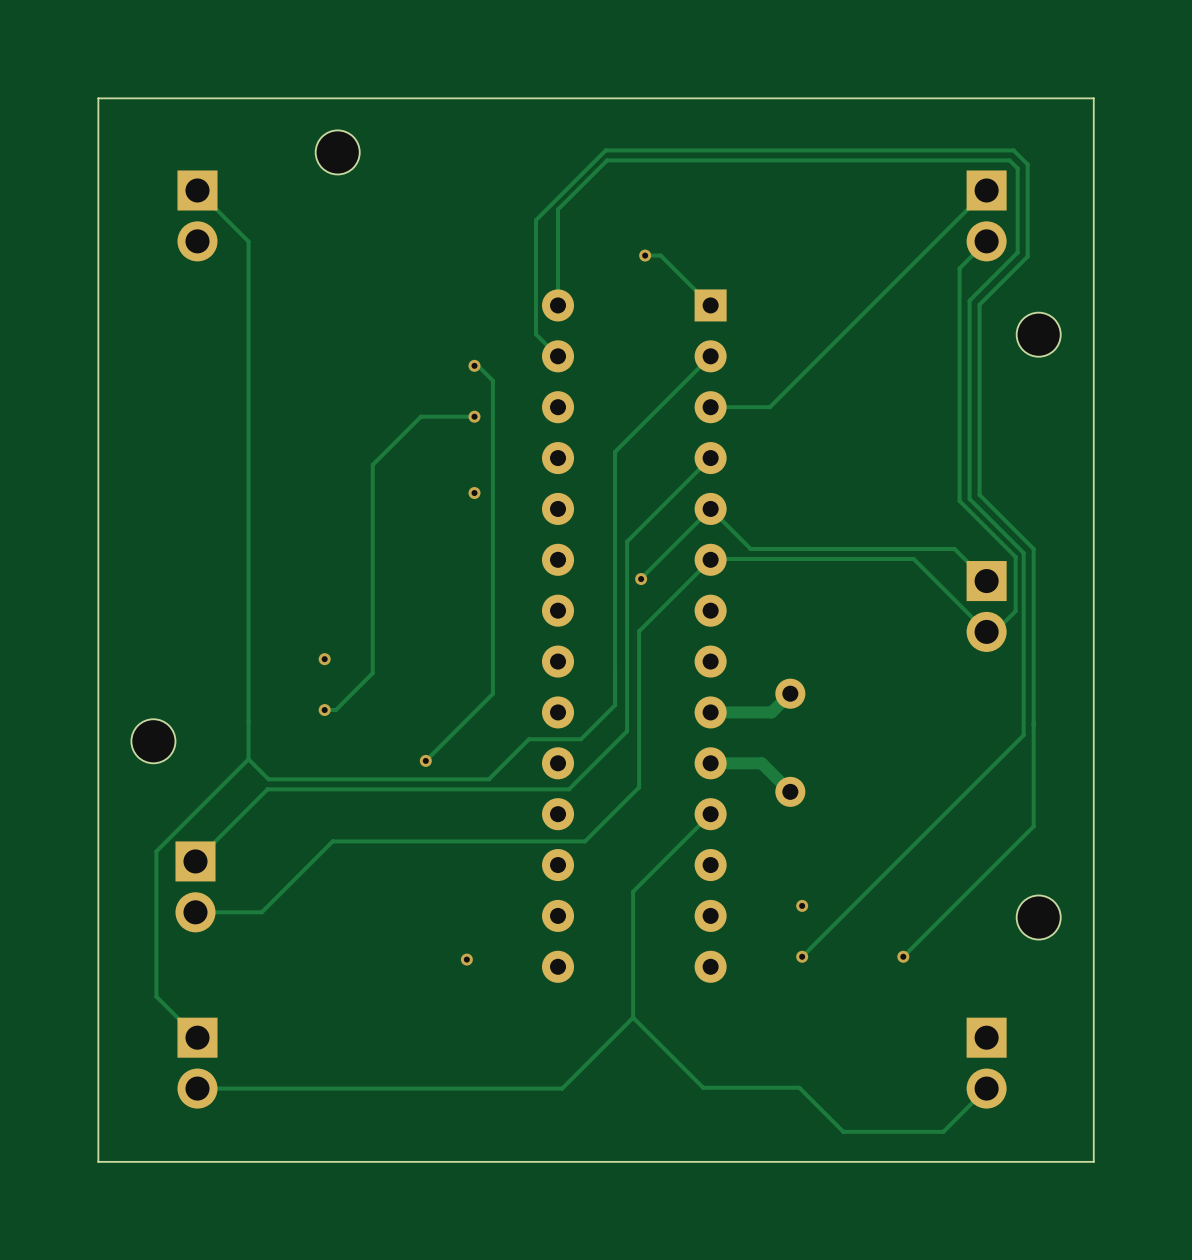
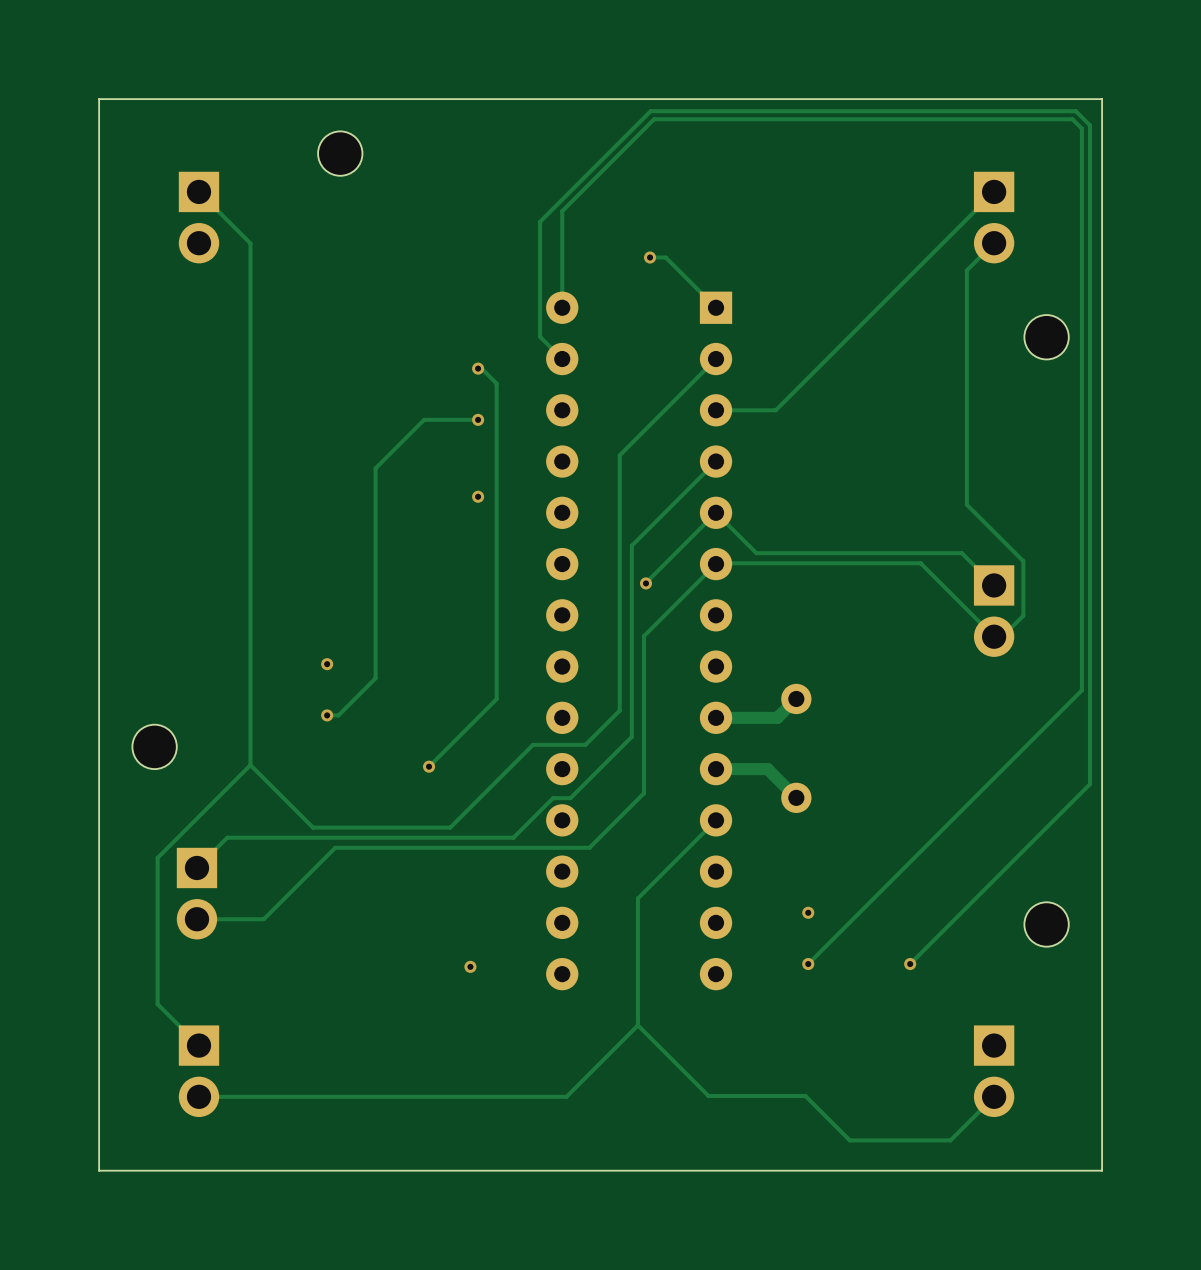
track: (605, 150) (1013, 150) (1027, 164) (1027, 256) (979, 304) (979, 494) (1033, 549) (1033, 826) -> (610, 151) (650, 111) (1075, 111) (1089, 125) (1089, 784) (1041, 832)
track: (607, 160) (1009, 160) (1017, 168) (1017, 252) (969, 300) (969, 498) (1023, 553) (1023, 735) -> (611, 161) (654, 119) (1072, 119) (1081, 128) (1081, 690) (1031, 740)
track: (488, 779) (268, 779) -> (492, 785) (450, 827) (313, 827) (270, 785)
track: (569, 789) (267, 789) (225, 831) -> (573, 795) (570, 798) (553, 798) (513, 837) (227, 837)

